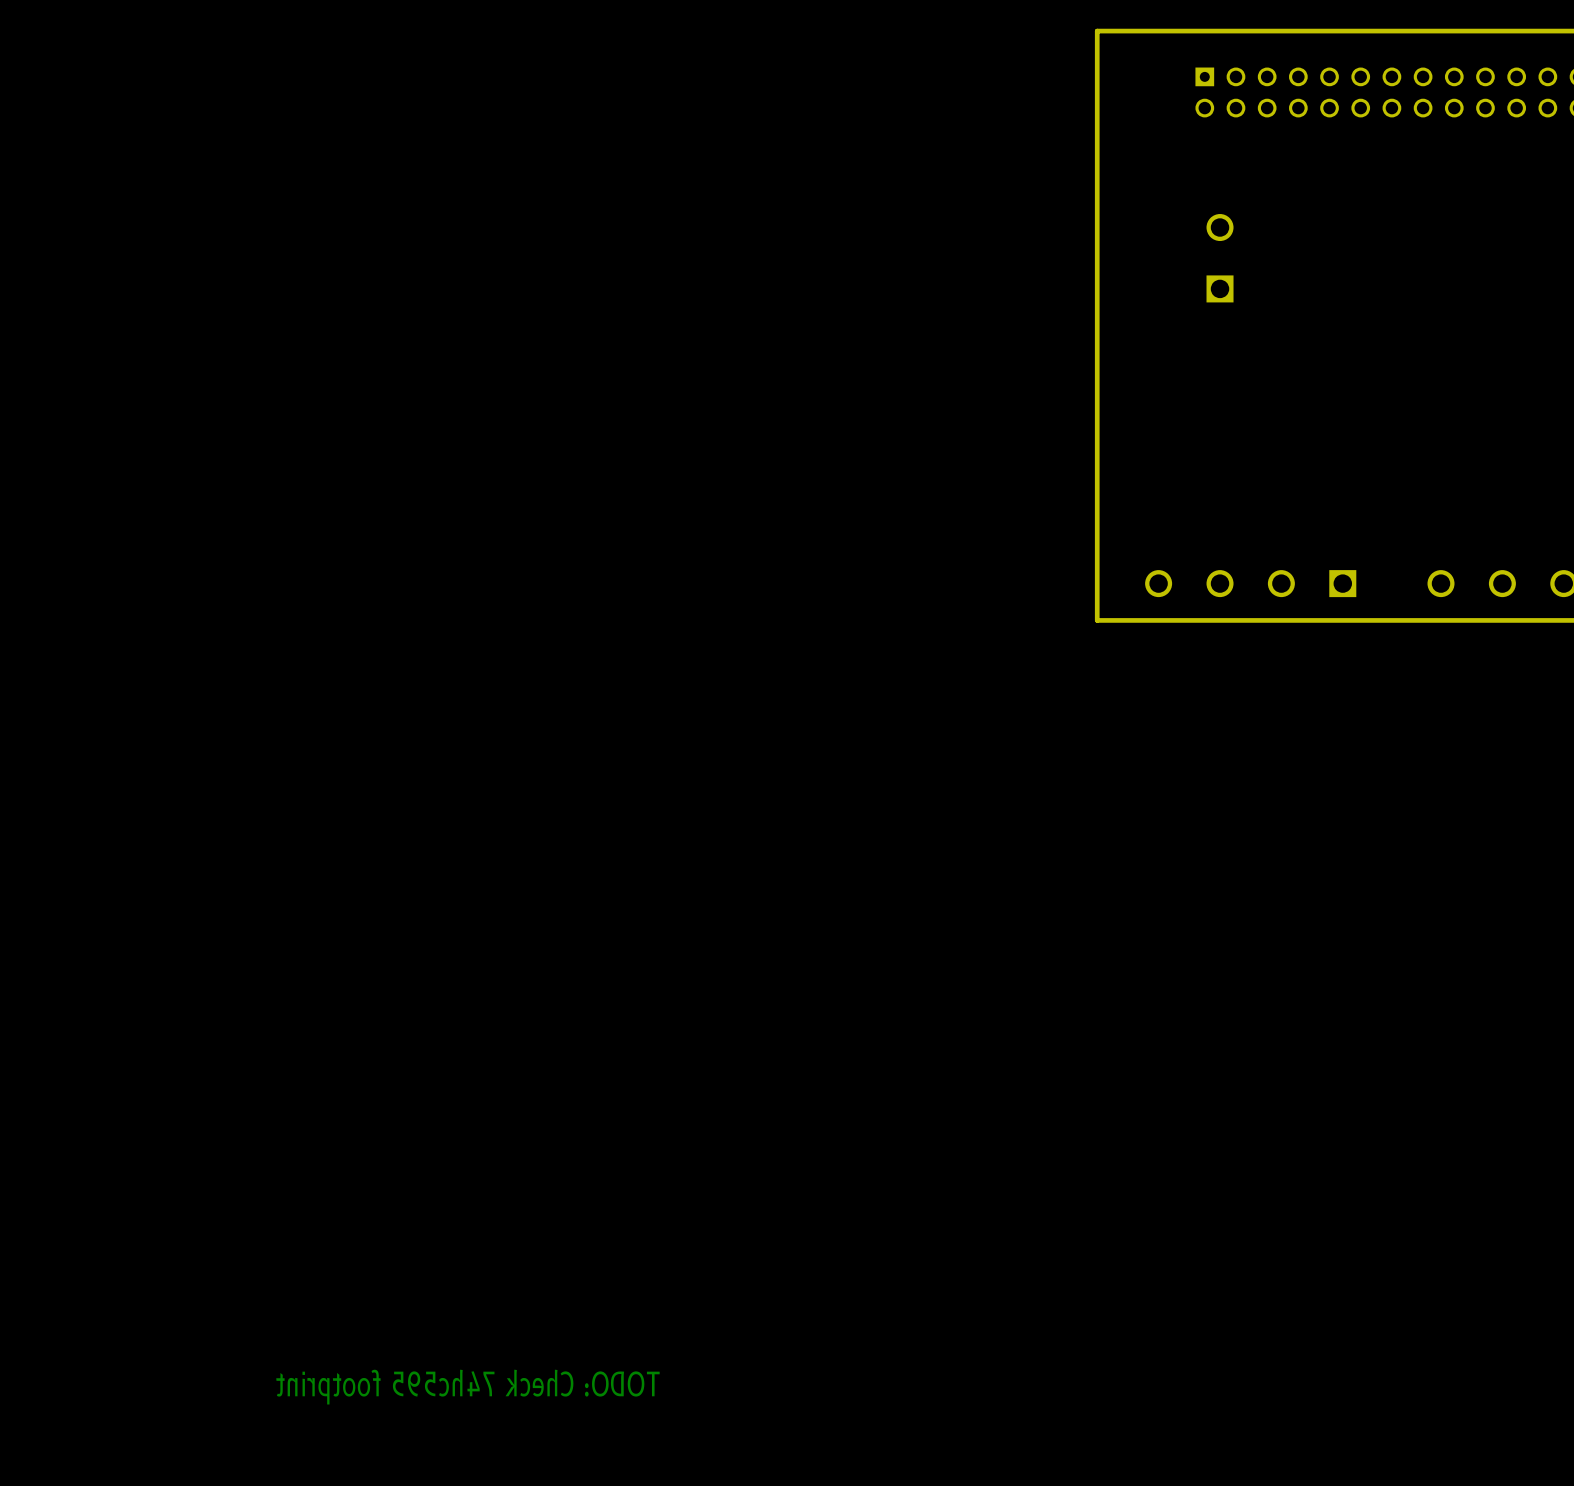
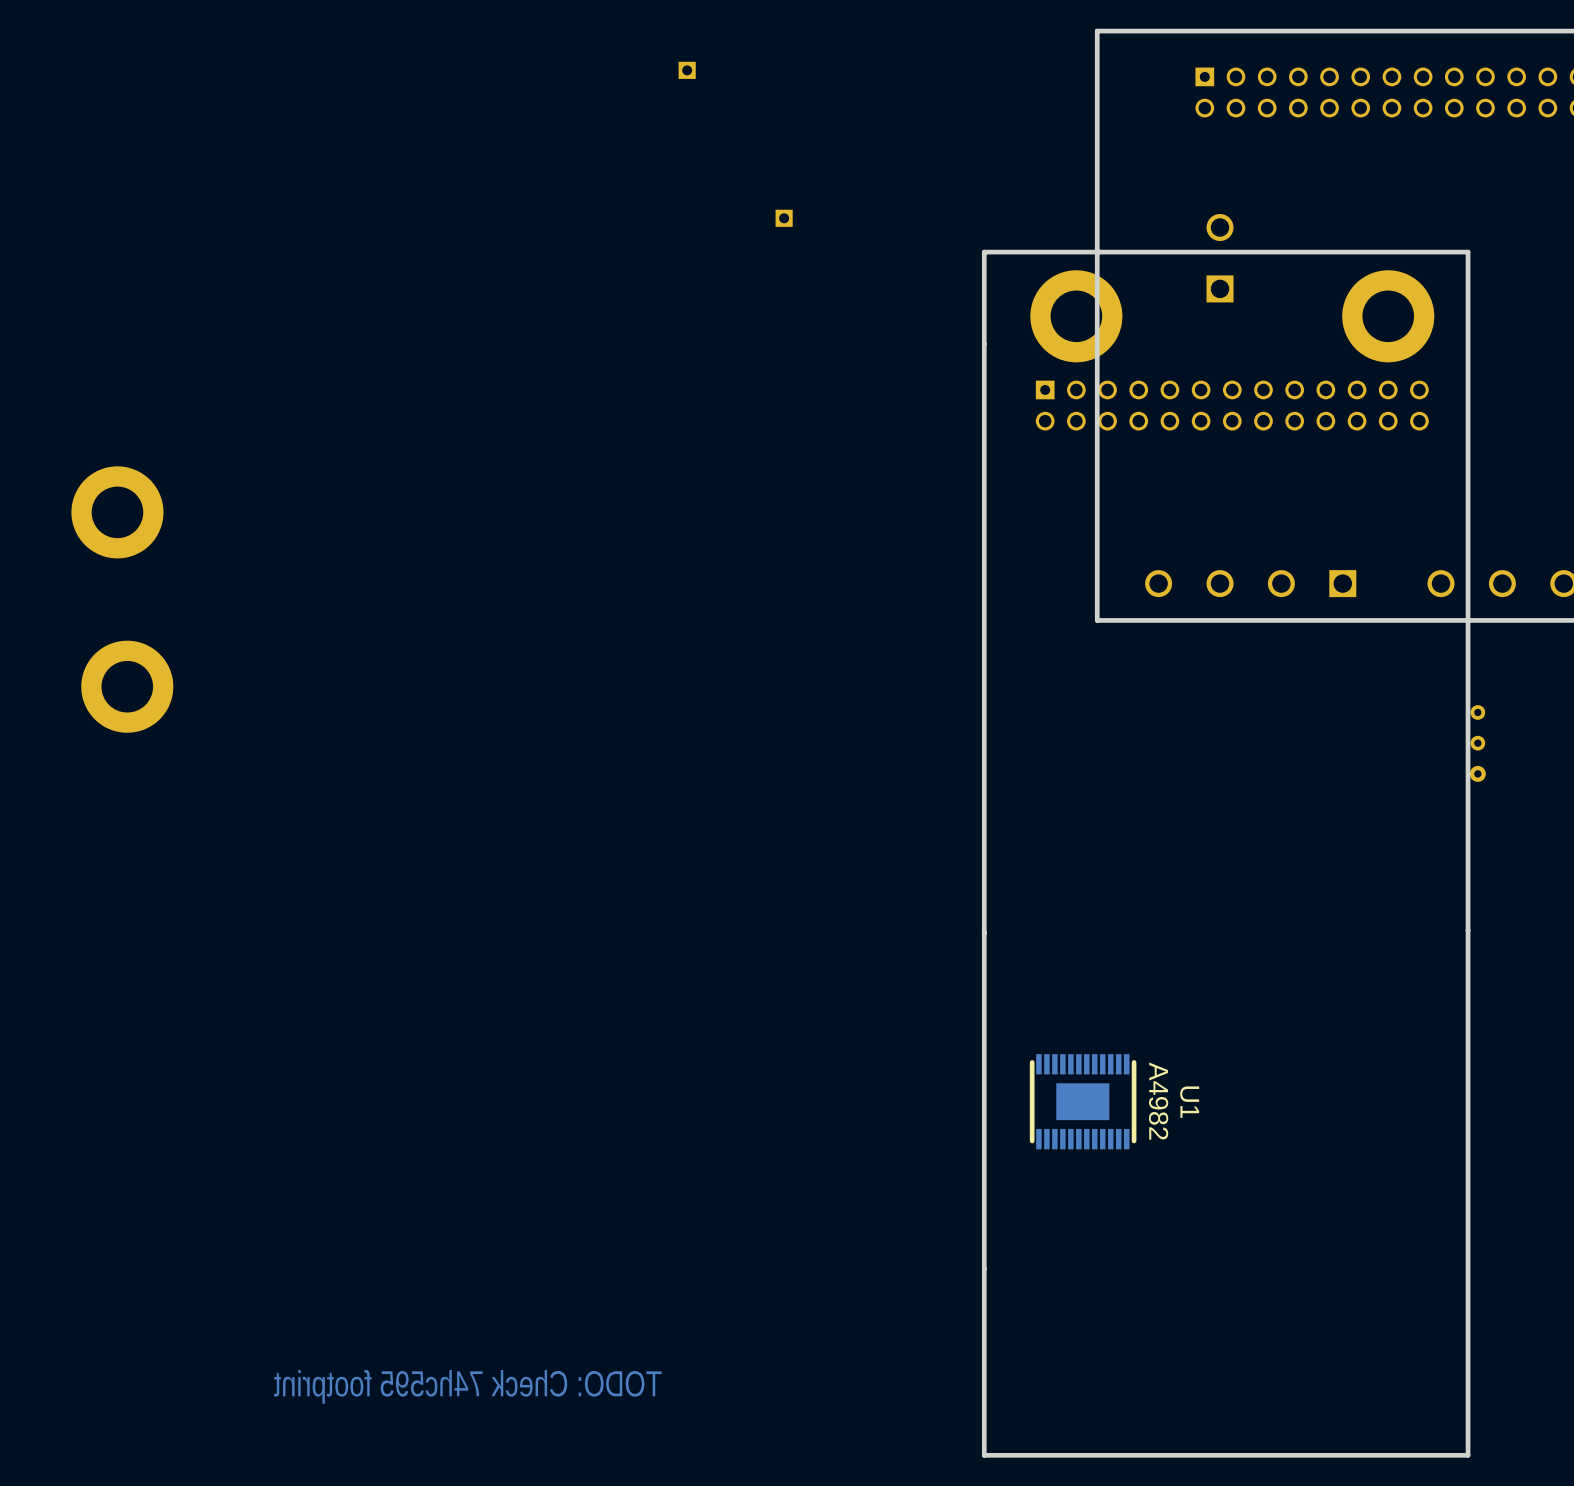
part: none -> (687, 70)
part: none -> (784, 218)
board edge: none -> (1468, 252) (1468, 1455) (984, 1455) (984, 252) (1468, 252)
part: none -> (1076, 316)
part: none -> (1388, 316)
part: none -> (1232, 405)
part: none -> (117, 512)
part: none -> (127, 686)
part: none -> (1477, 743)
U1: none -> A4982 (1083, 1101)

